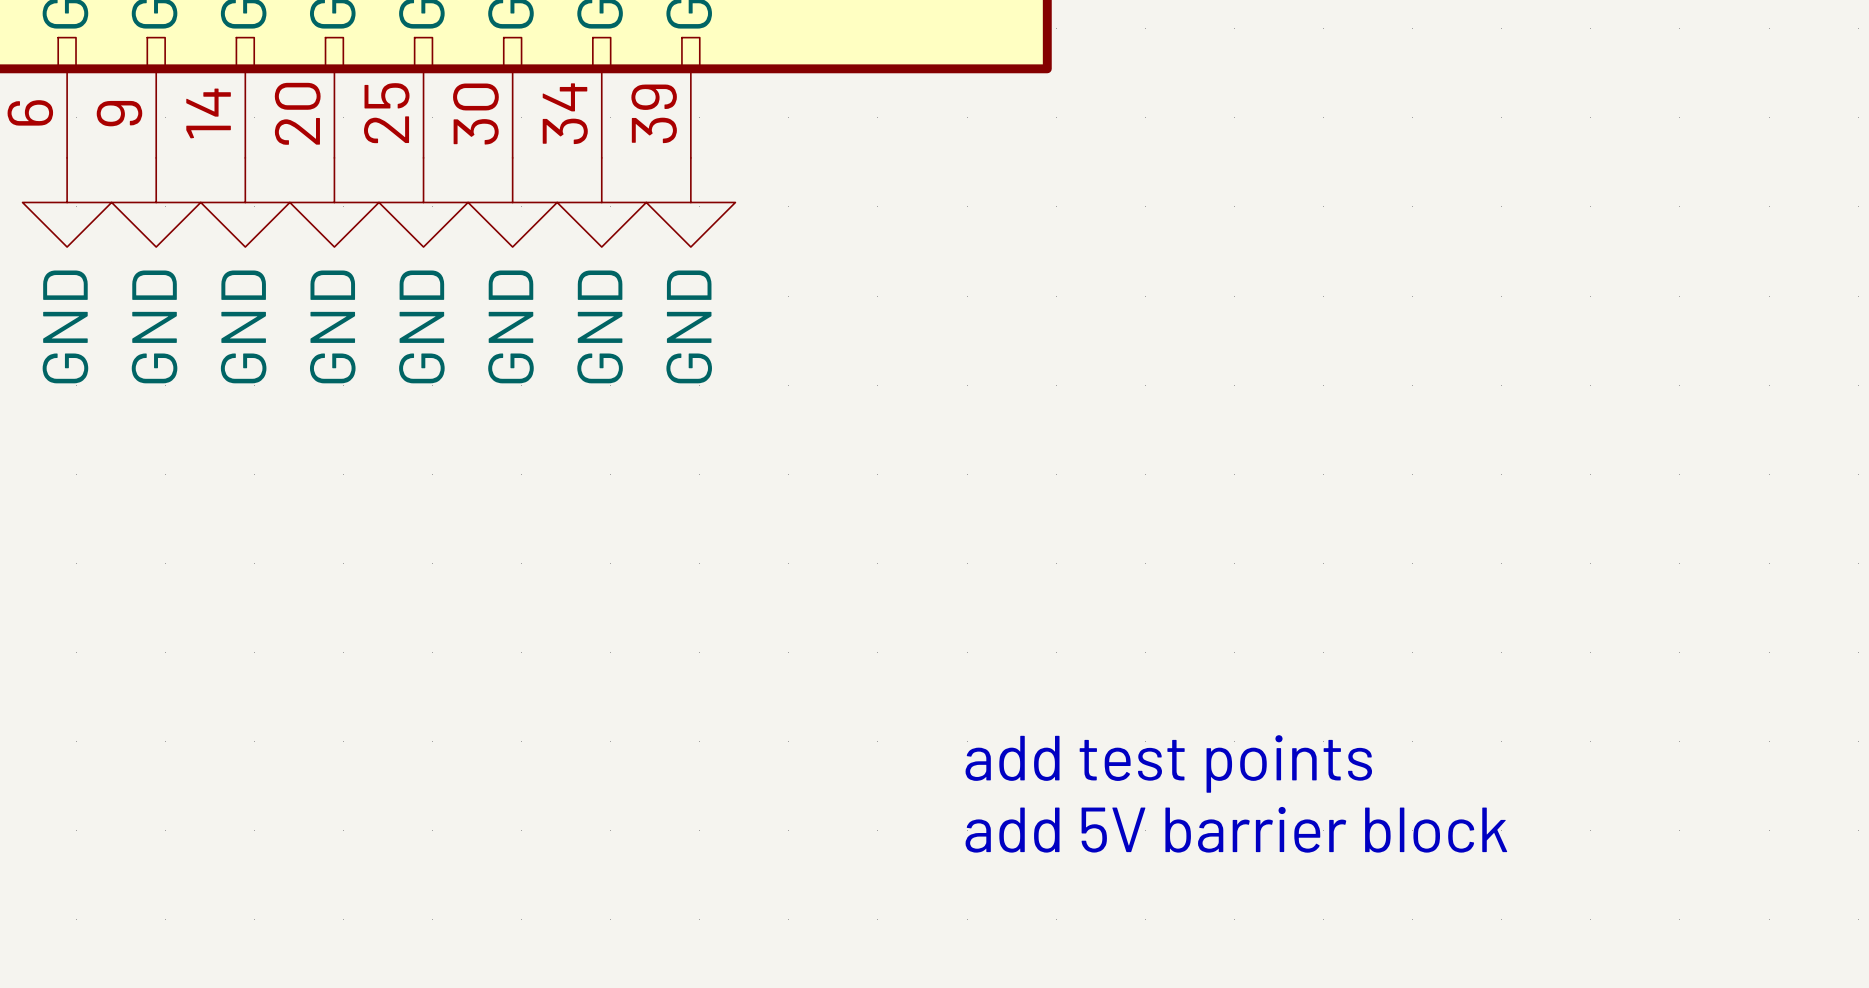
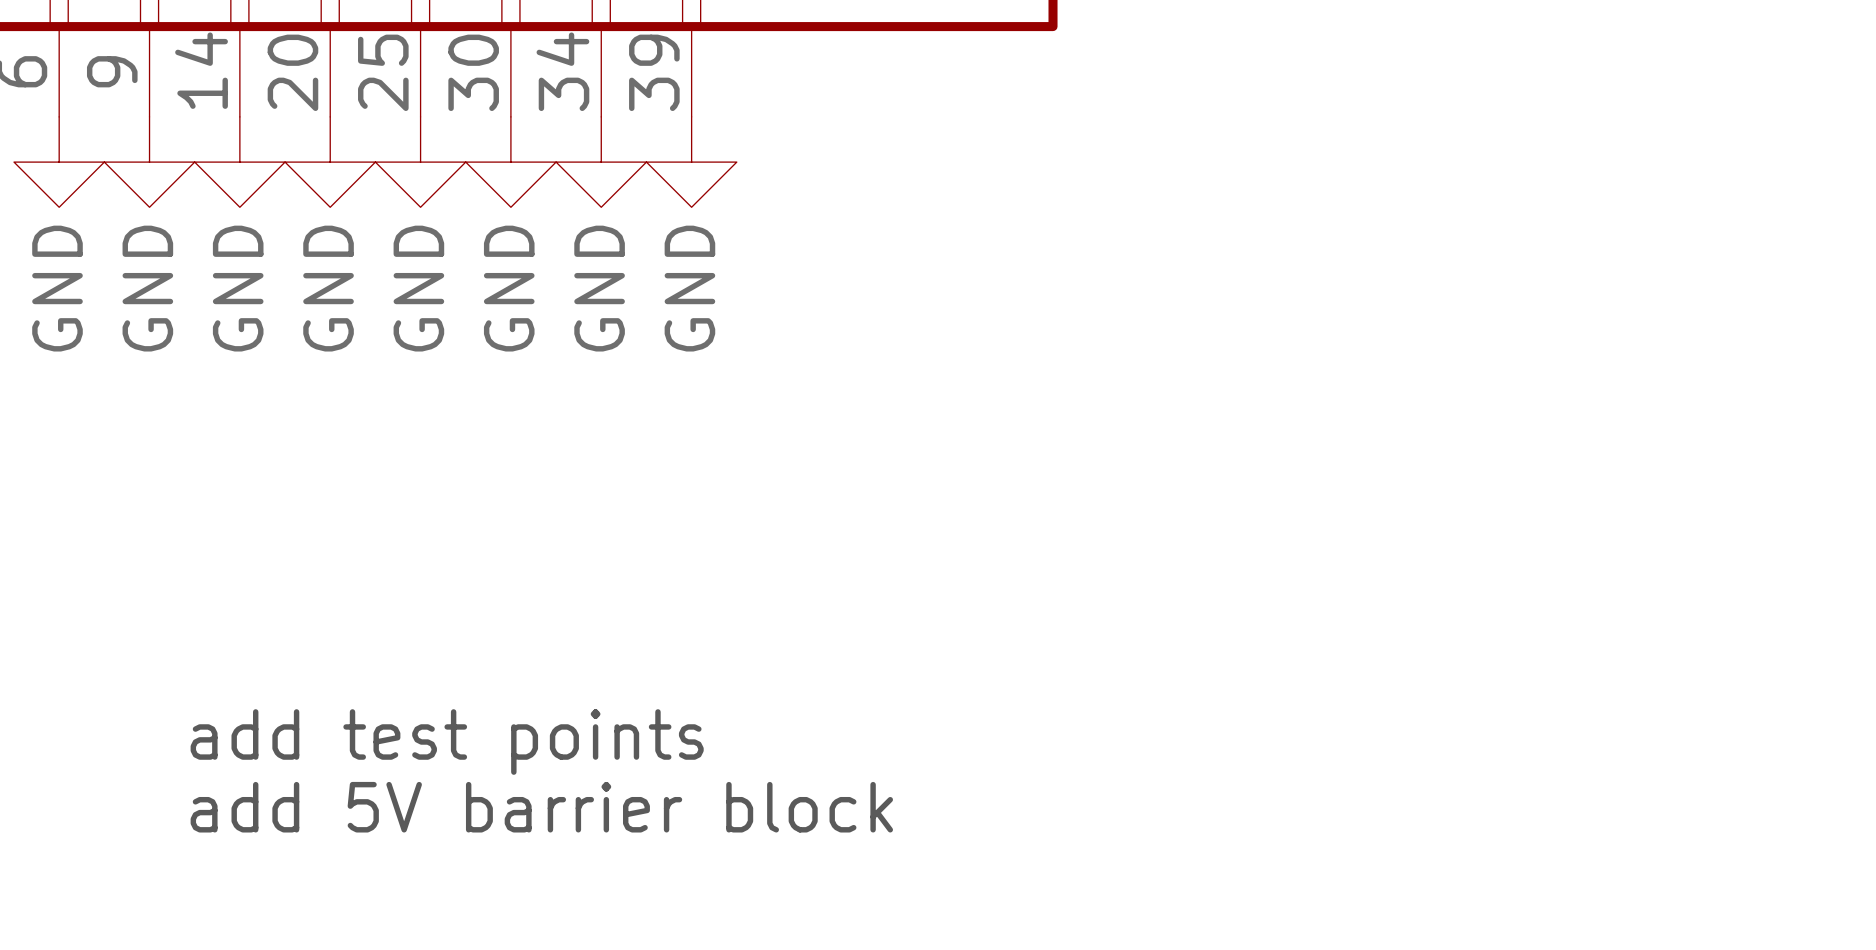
text position: add test points (1168, 763) -> add test points (447, 742)
text position: add 5V barrier block (1236, 829) -> add 5V barrier block (541, 807)

